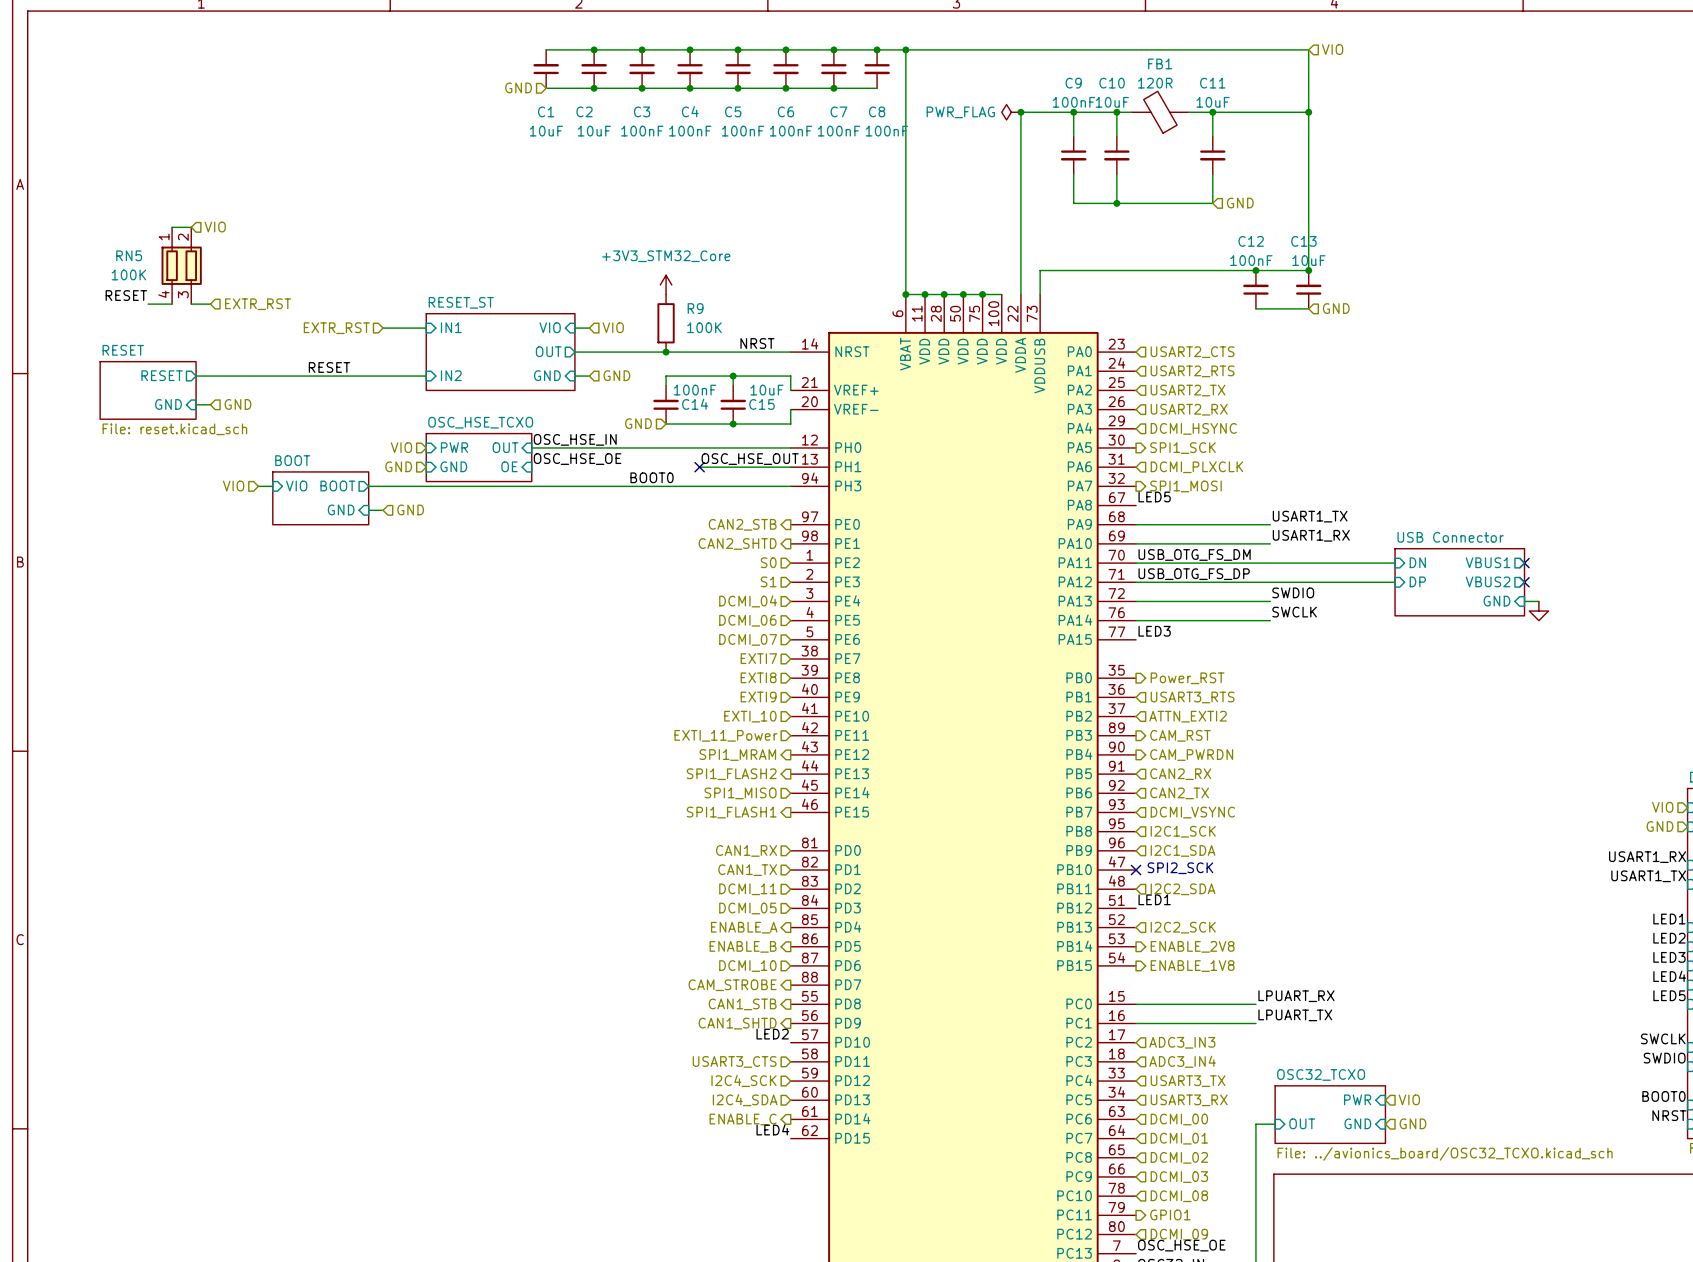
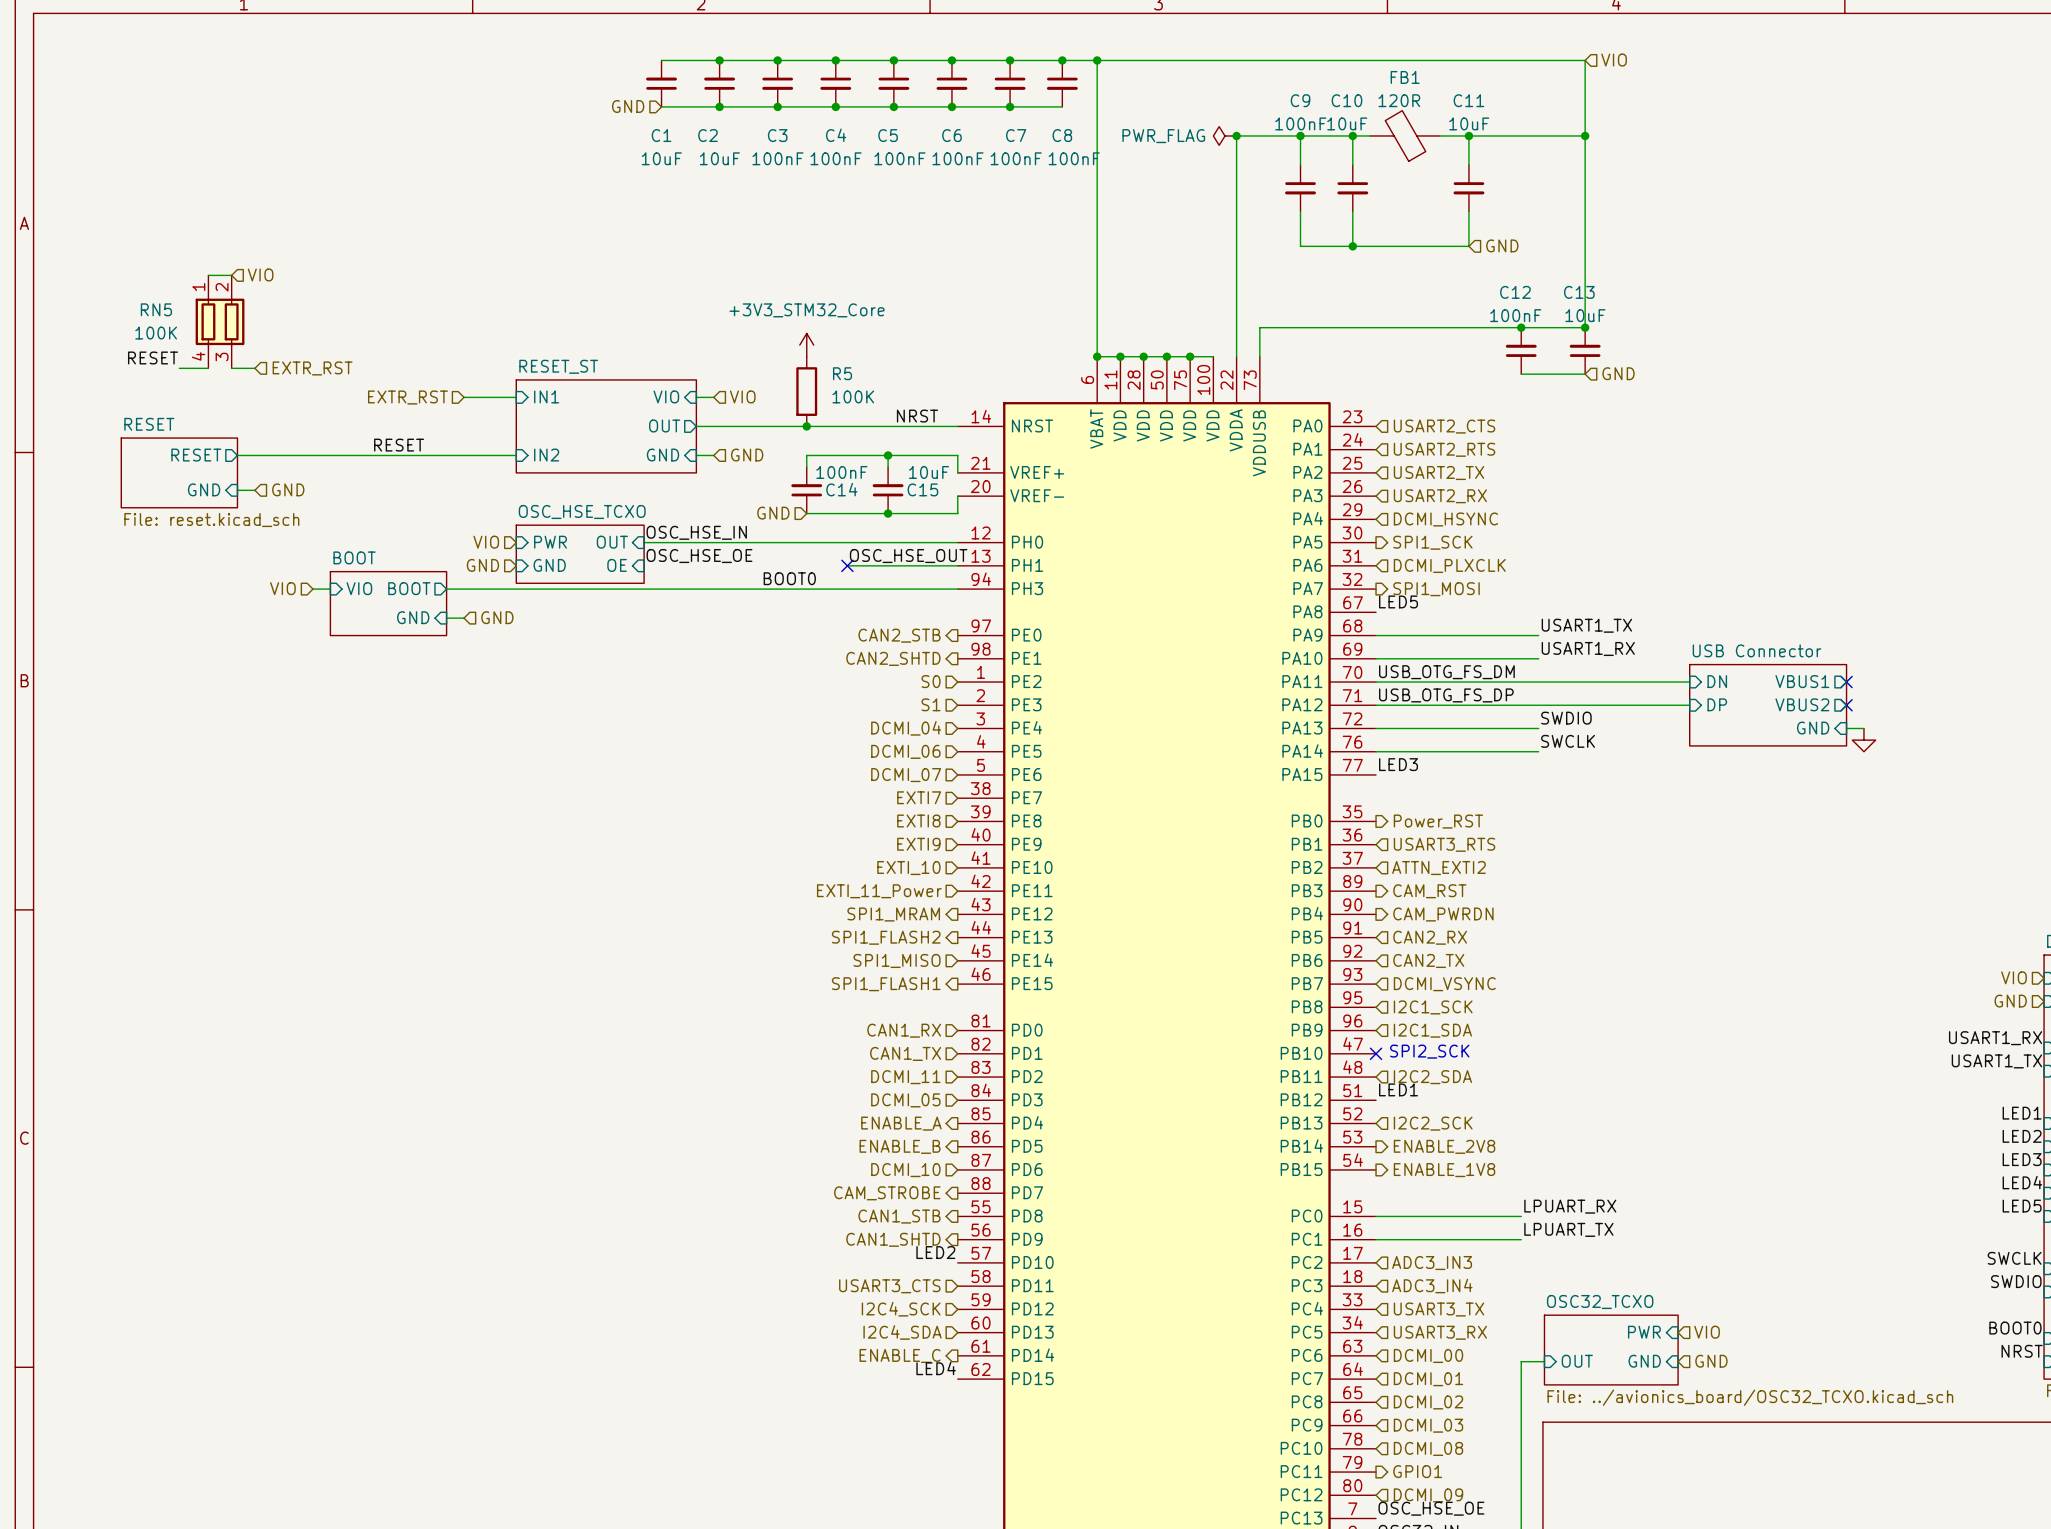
R9 name: R9 (695, 308) -> R5 (842, 373)

